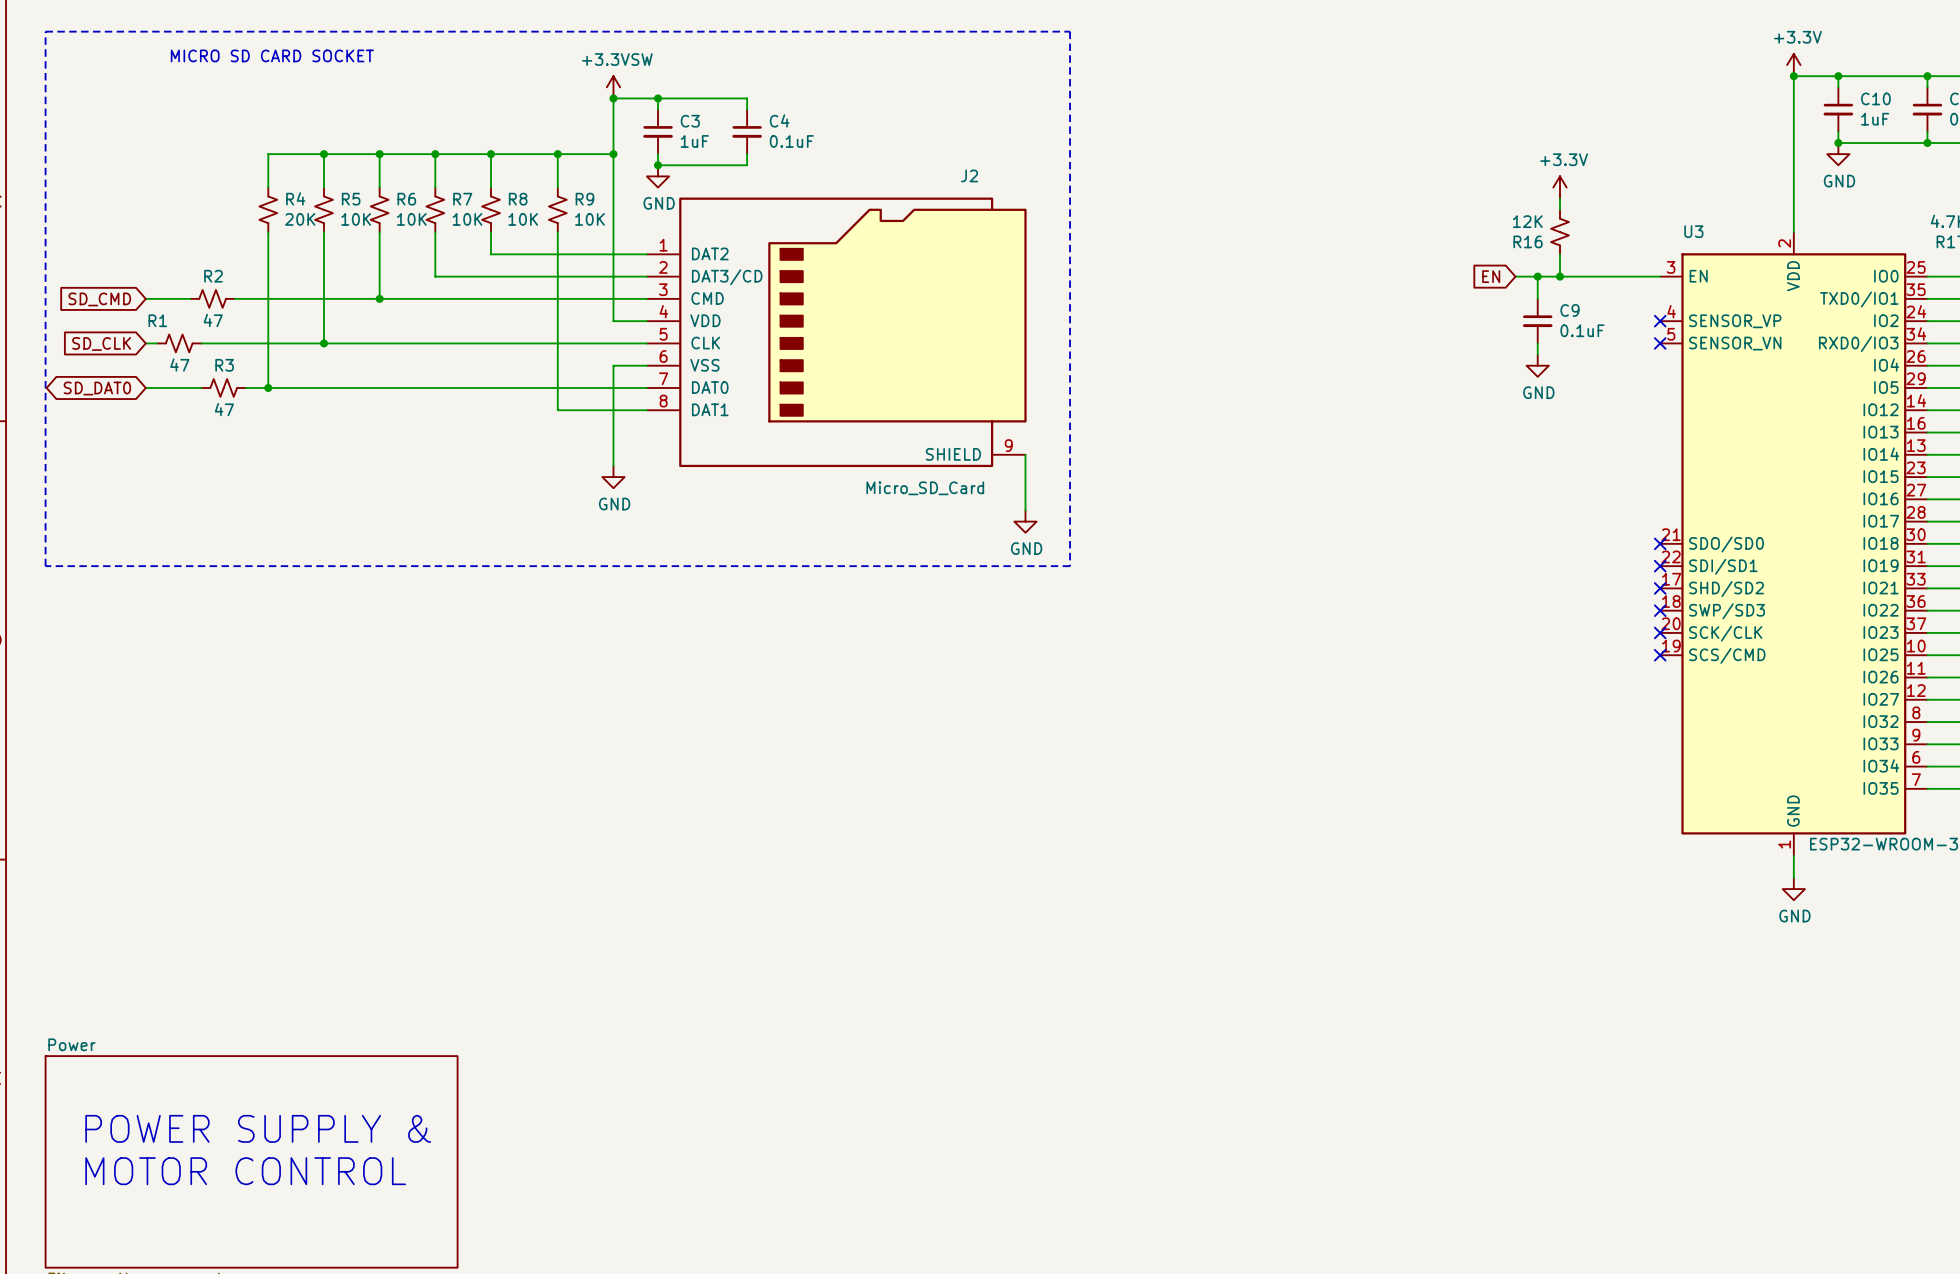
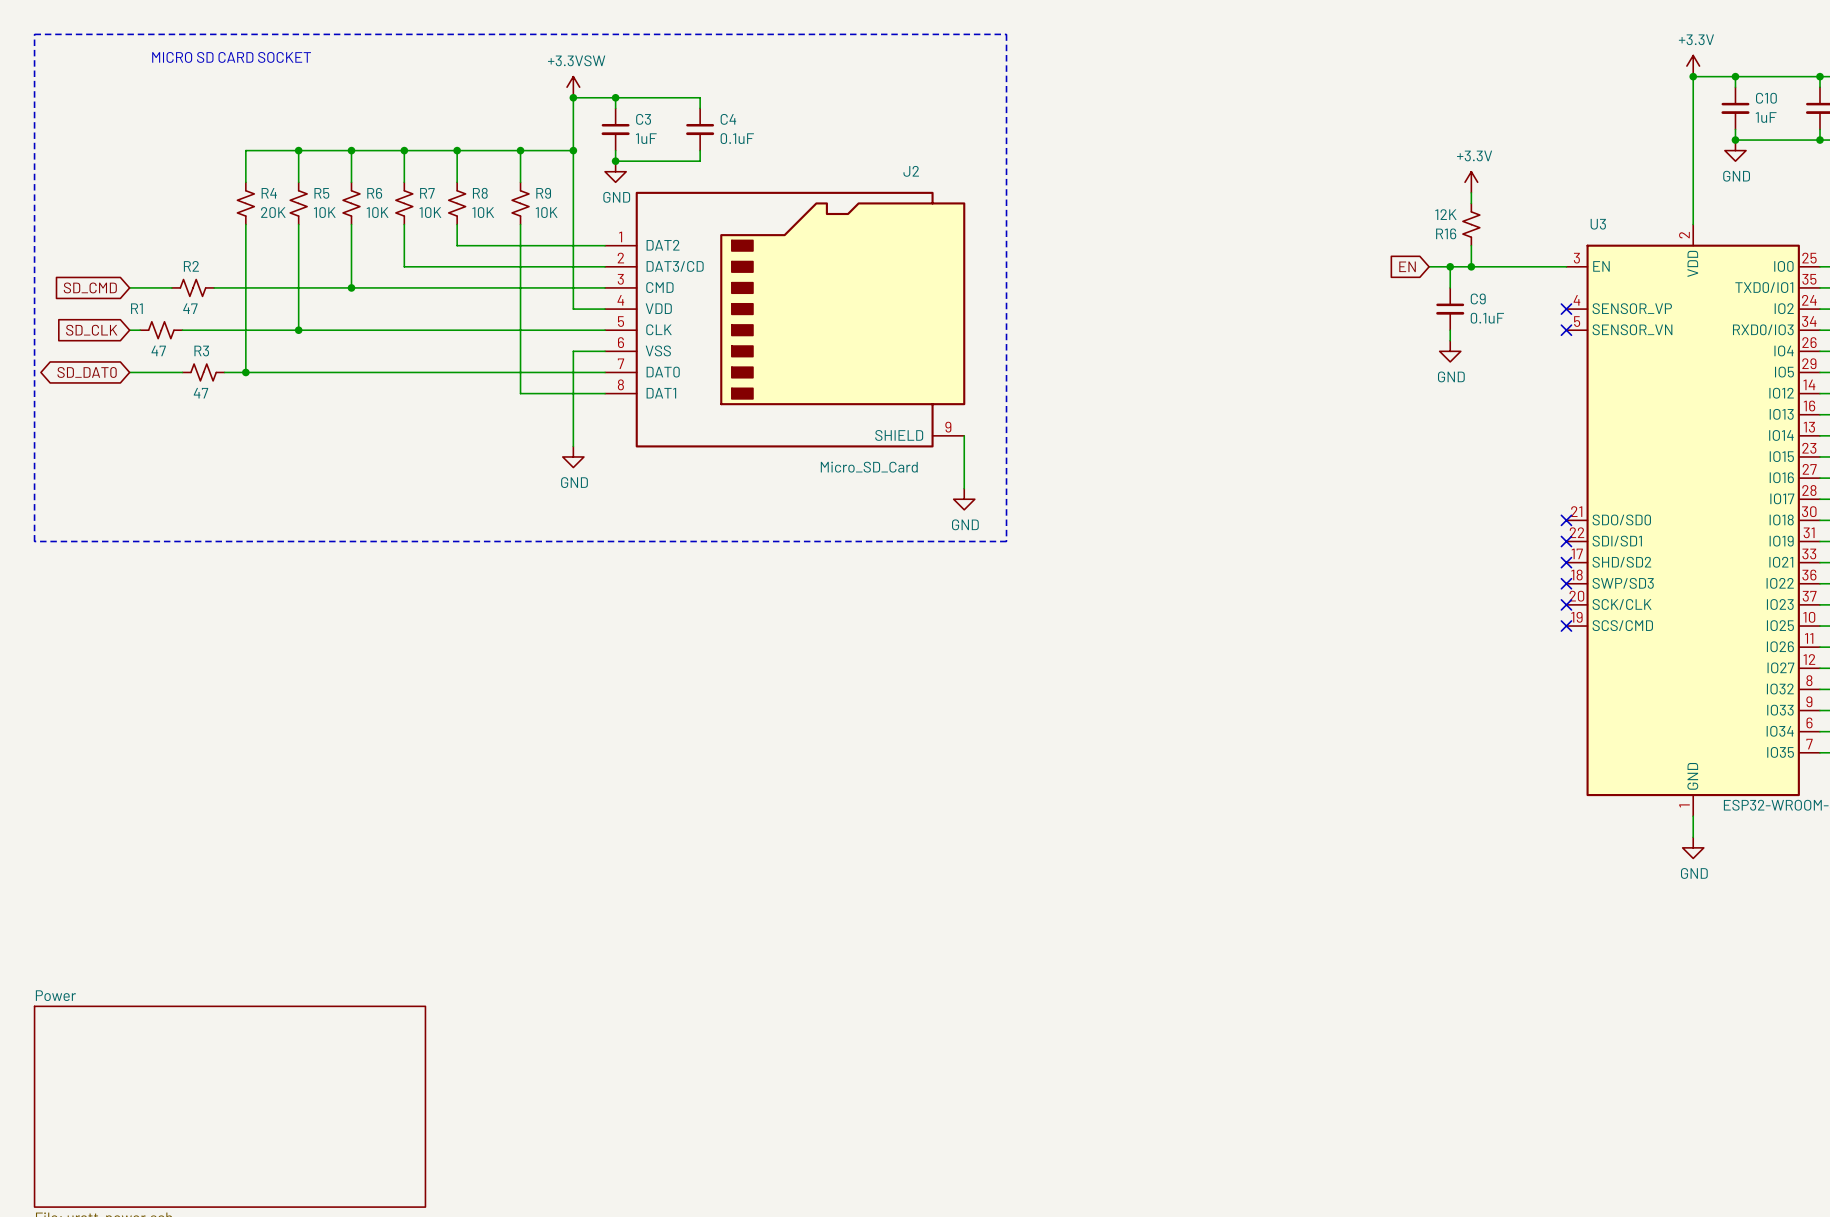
text: POWER SUPPLY & (258, 1128) -> none
text: MOTOR CONTROL (245, 1171) -> none

